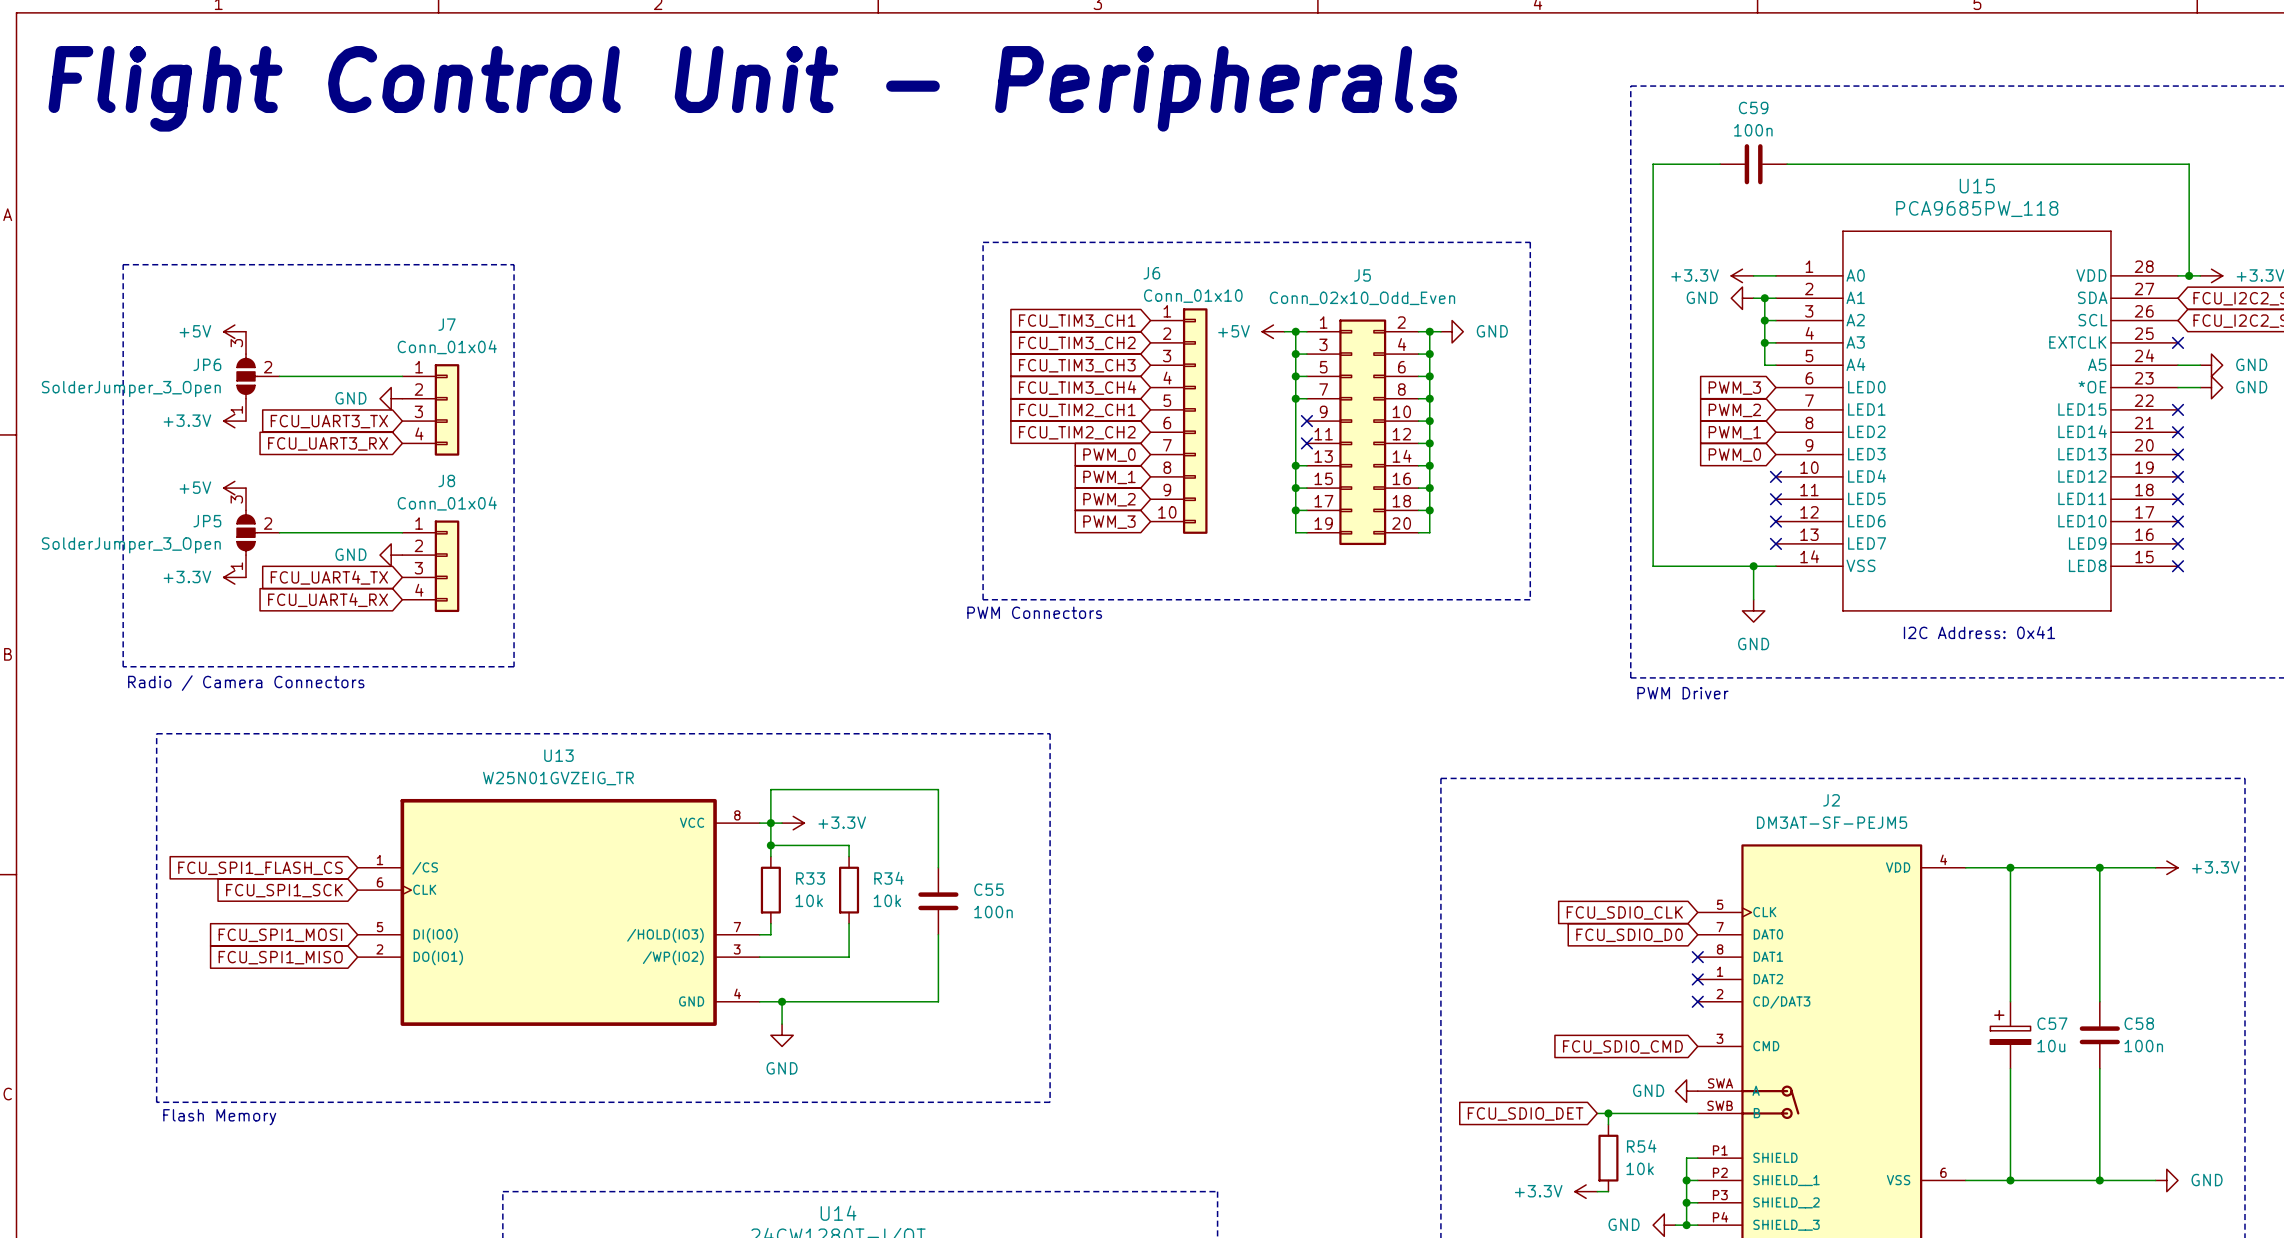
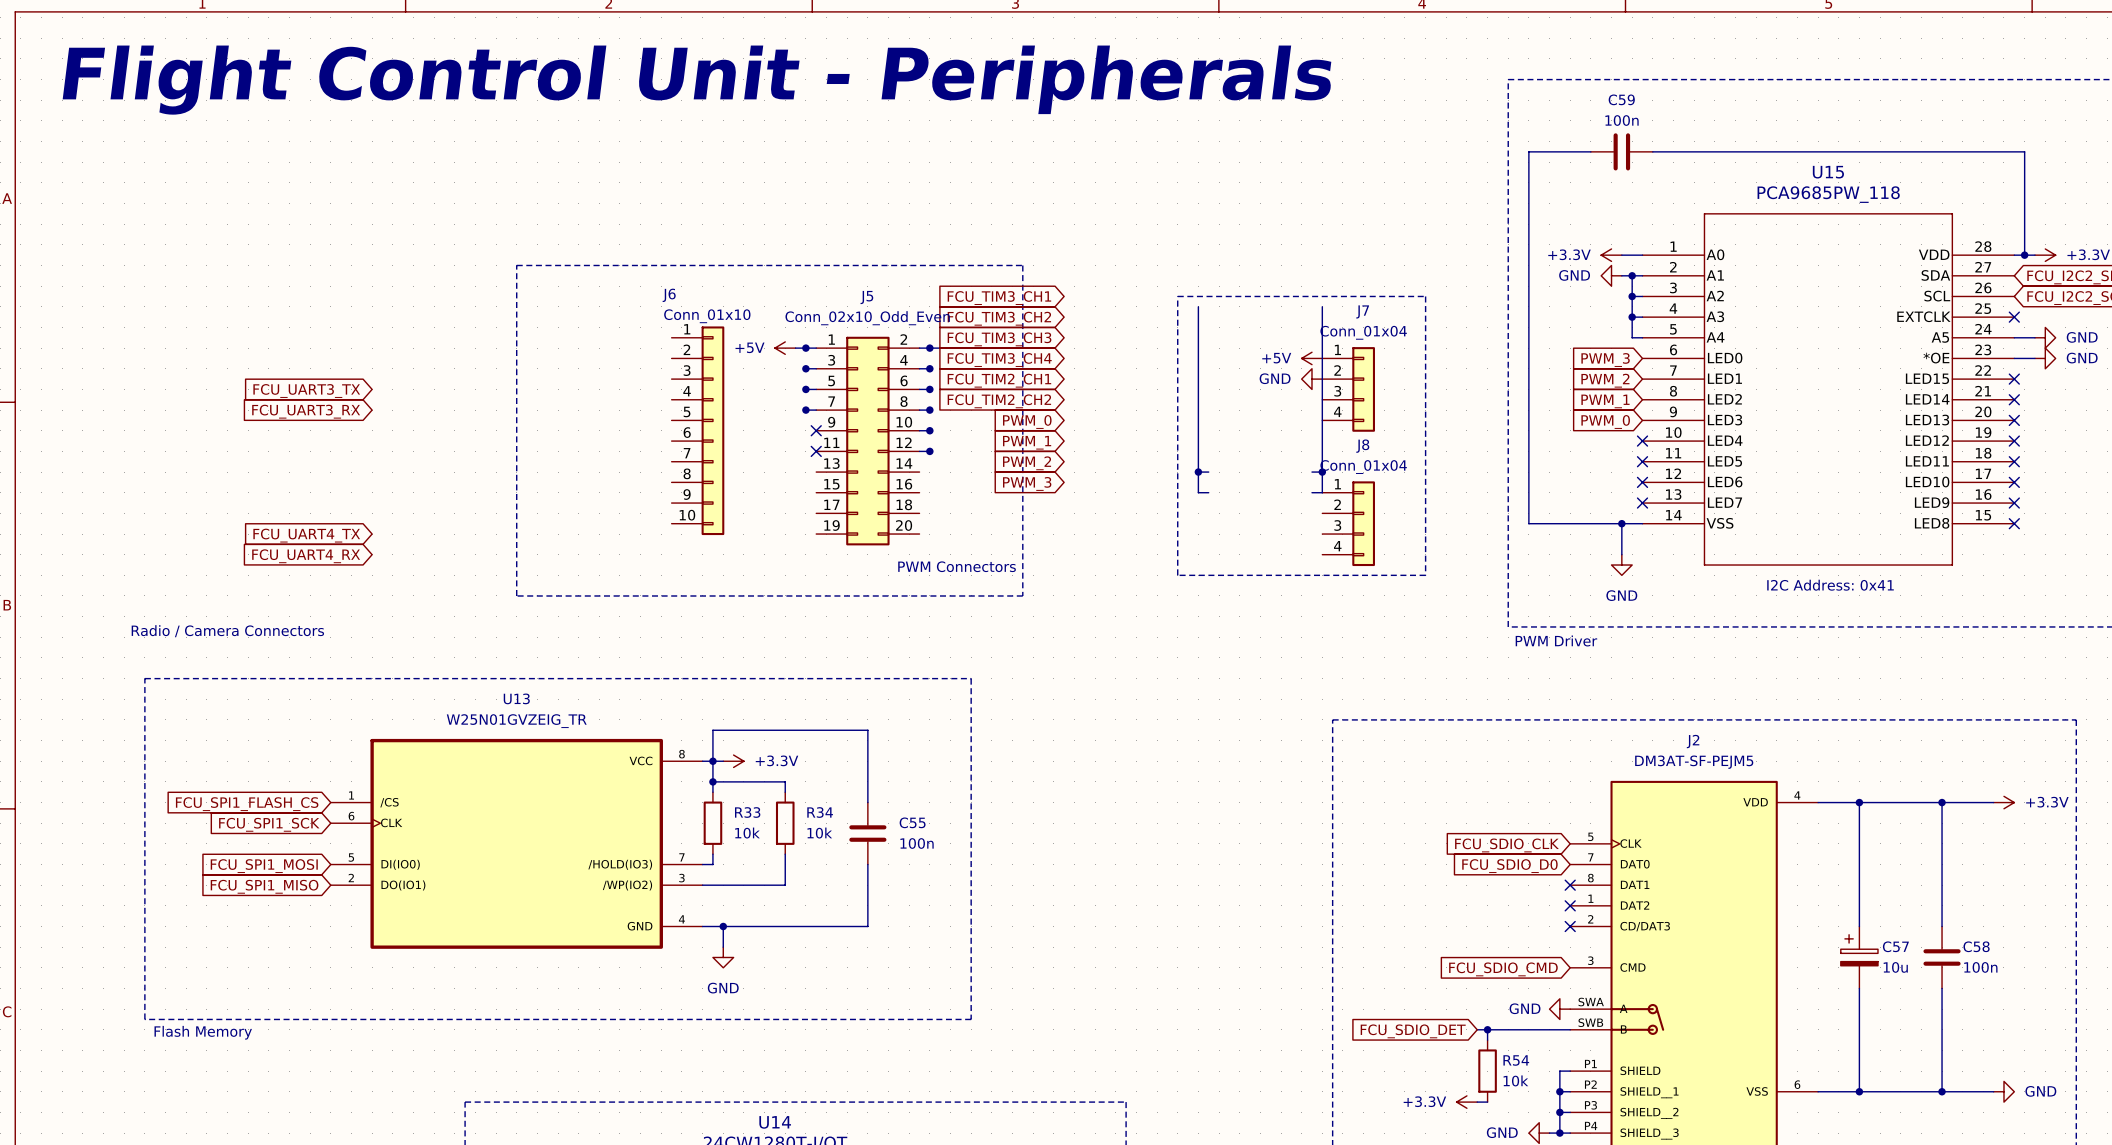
line: (983, 242) (1530, 242) (1530, 599) (983, 599) (983, 242) -> none
line: (123, 264) (514, 264) (514, 666) (123, 666) (123, 264) -> none
line: none -> (516, 265) (1022, 265) (1022, 595) (516, 595) (516, 265)
line: none -> (1177, 296) (1425, 296) (1425, 575) (1177, 575) (1177, 296)
power symbol: +5V (234, 331) -> none
power symbol position: +5V (1273, 331) -> +5V (1311, 358)
wire: (1284, 331) (1306, 331) -> none
junction: (1295, 331) -> none
wire: (1418, 331) (1440, 331) -> none
junction: (1429, 331) -> none
power symbol rotation: 0° (1452, 331) -> 180° (1311, 379)
power symbol position: GND (1452, 331) -> GND (1311, 379)
wire: (1295, 354) (1306, 354) -> none
junction: (1295, 354) -> none
wire: (1418, 354) (1429, 354) -> none
junction: (1429, 354) -> none
JP6: SolderJumper_3_Open (258, 376) -> none
wire: (279, 376) (402, 376) -> none
power symbol: none -> +5V (785, 348)
wire: none -> (795, 348) (816, 348)
junction: none -> (805, 348)
wire: none -> (919, 348) (940, 348)
junction: none -> (929, 348)
wire: (1295, 376) (1306, 376) -> none
junction: (1295, 376) -> none
wire: (1418, 376) (1429, 376) -> none
junction: (1429, 376) -> none
power symbol: GND (391, 398) -> none
wire: none -> (805, 368) (816, 368)
junction: none -> (805, 368)
wire: none -> (919, 368) (929, 368)
junction: none -> (929, 368)
wire: (1295, 398) (1306, 398) -> none
junction: (1295, 398) -> none
wire: (1418, 398) (1429, 398) -> none
junction: (1429, 398) -> none
J7 position: (430, 409) -> (1348, 389)
power symbol: +3.3V (234, 421) -> none
wire: none -> (805, 389) (816, 389)
junction: none -> (805, 389)
wire: none -> (919, 389) (929, 389)
junction: none -> (929, 389)
J6 position: (1179, 421) -> (697, 430)
no-connect mark: (1306, 421) -> none
wire: (1418, 421) (1429, 421) -> none
junction: (1429, 421) -> none
J5 position: (1362, 432) -> (867, 441)
wire: none -> (805, 410) (816, 410)
junction: none -> (805, 410)
wire: none -> (919, 410) (929, 410)
junction: none -> (929, 410)
no-connect mark: (1306, 443) -> none
wire: (1418, 443) (1429, 443) -> none
junction: (1429, 443) -> none
no-connect mark: none -> (816, 430)
wire: none -> (919, 430) (929, 430)
junction: none -> (929, 430)
wire: (1295, 465) (1306, 465) -> none
junction: (1295, 465) -> none
wire: (1418, 465) (1429, 465) -> none
junction: (1429, 465) -> none
power symbol: +5V (234, 488) -> none
no-connect mark: none -> (816, 451)
wire: none -> (919, 451) (929, 451)
junction: none -> (929, 451)
wire: (1295, 488) (1306, 488) -> none
junction: (1295, 488) -> none
wire: (1418, 488) (1429, 488) -> none
junction: (1429, 488) -> none
JP5: SolderJumper_3_Open (258, 532) -> none
wire: (279, 532) (402, 532) -> none
power symbol: GND (391, 555) -> none
J8 position: (430, 566) -> (1348, 523)
power symbol: +3.3V (234, 577) -> none

